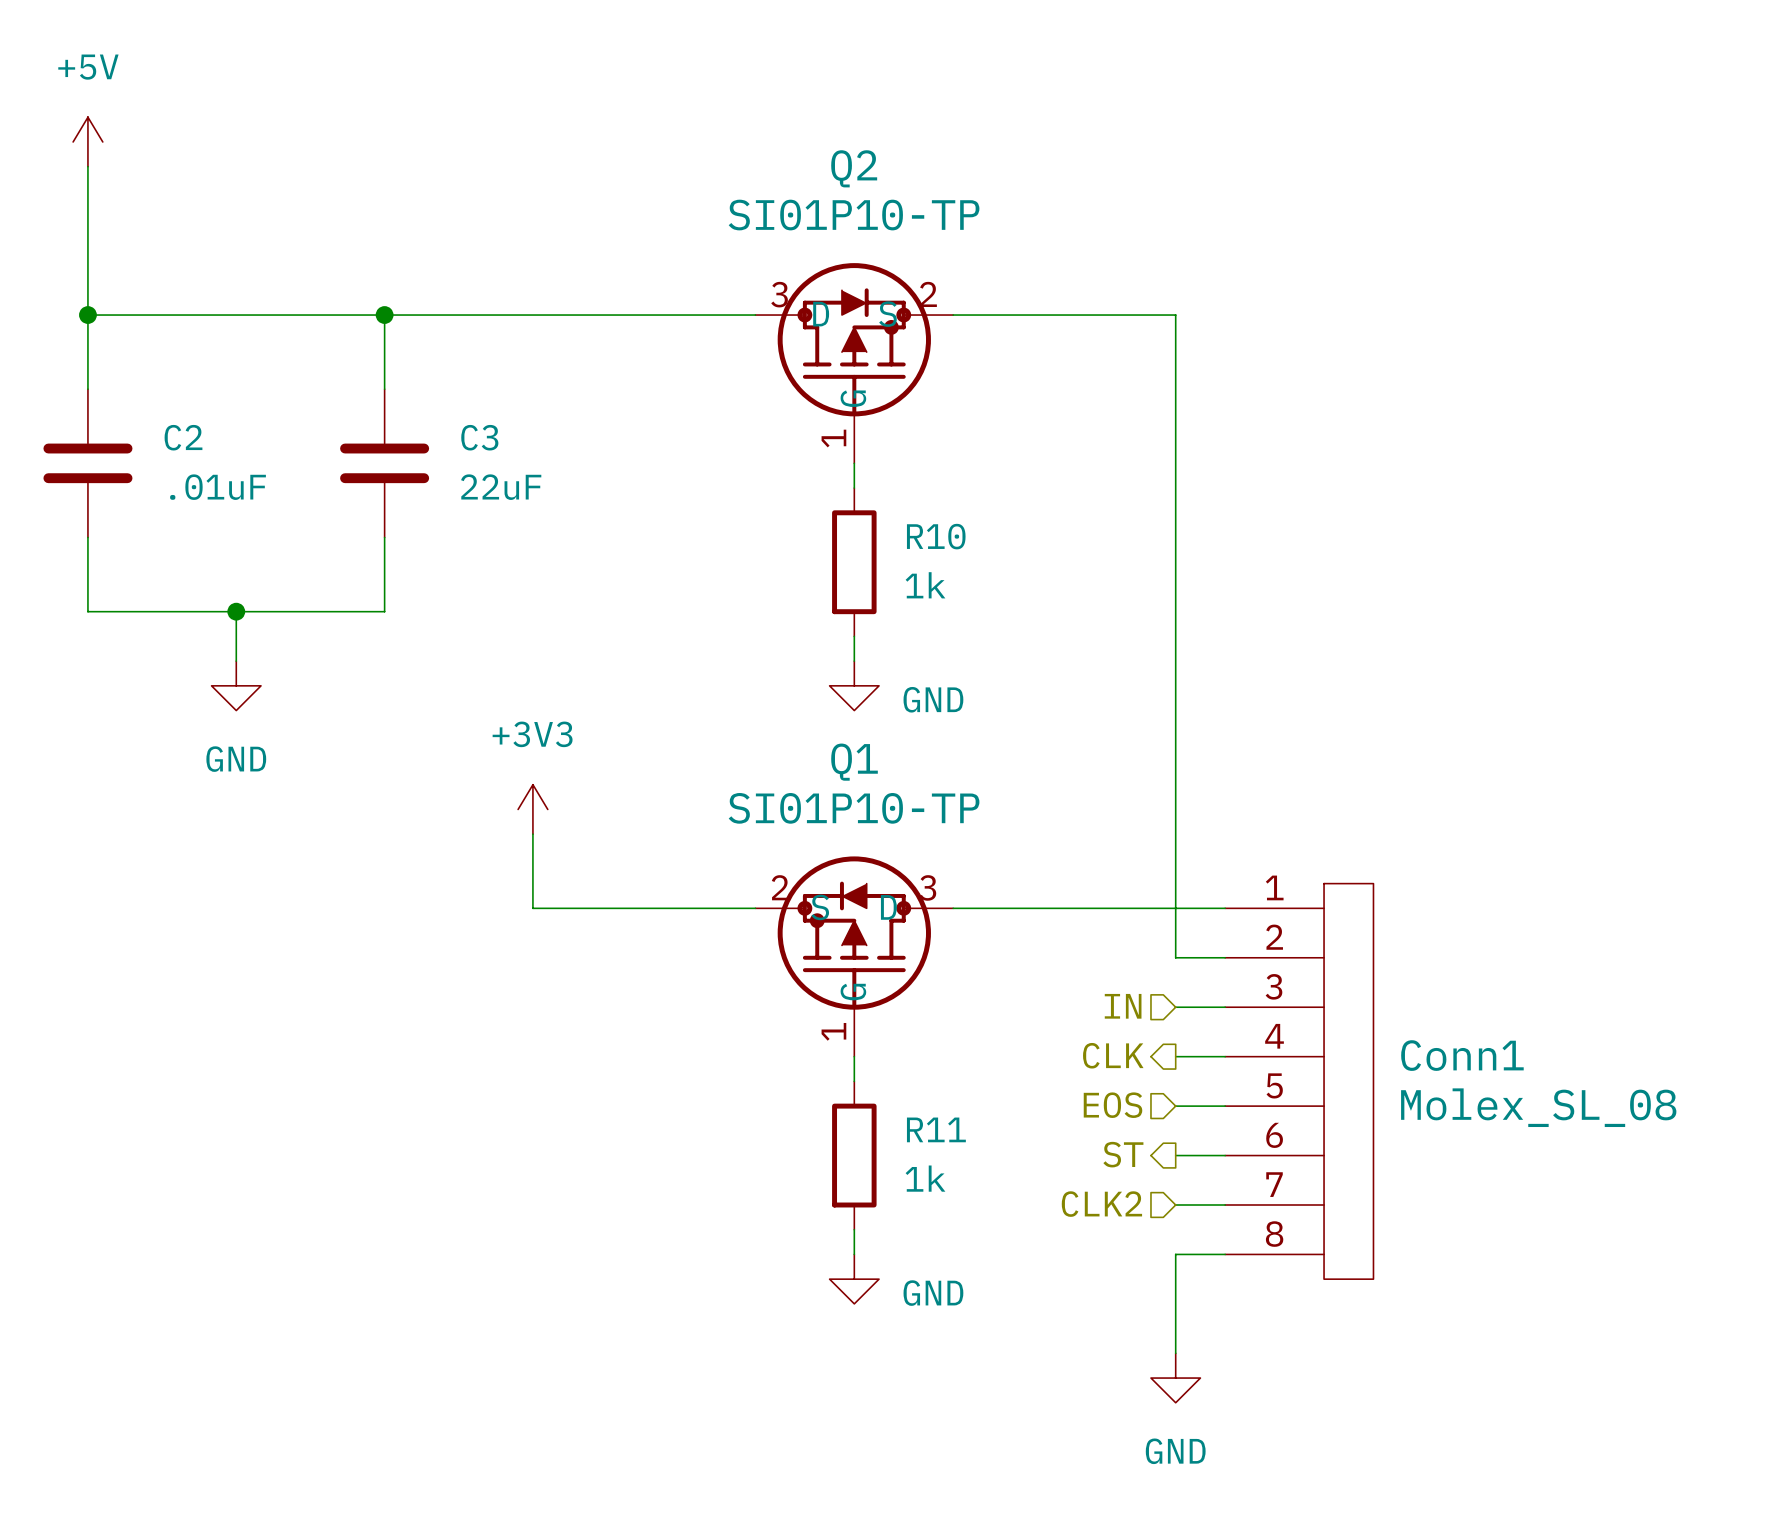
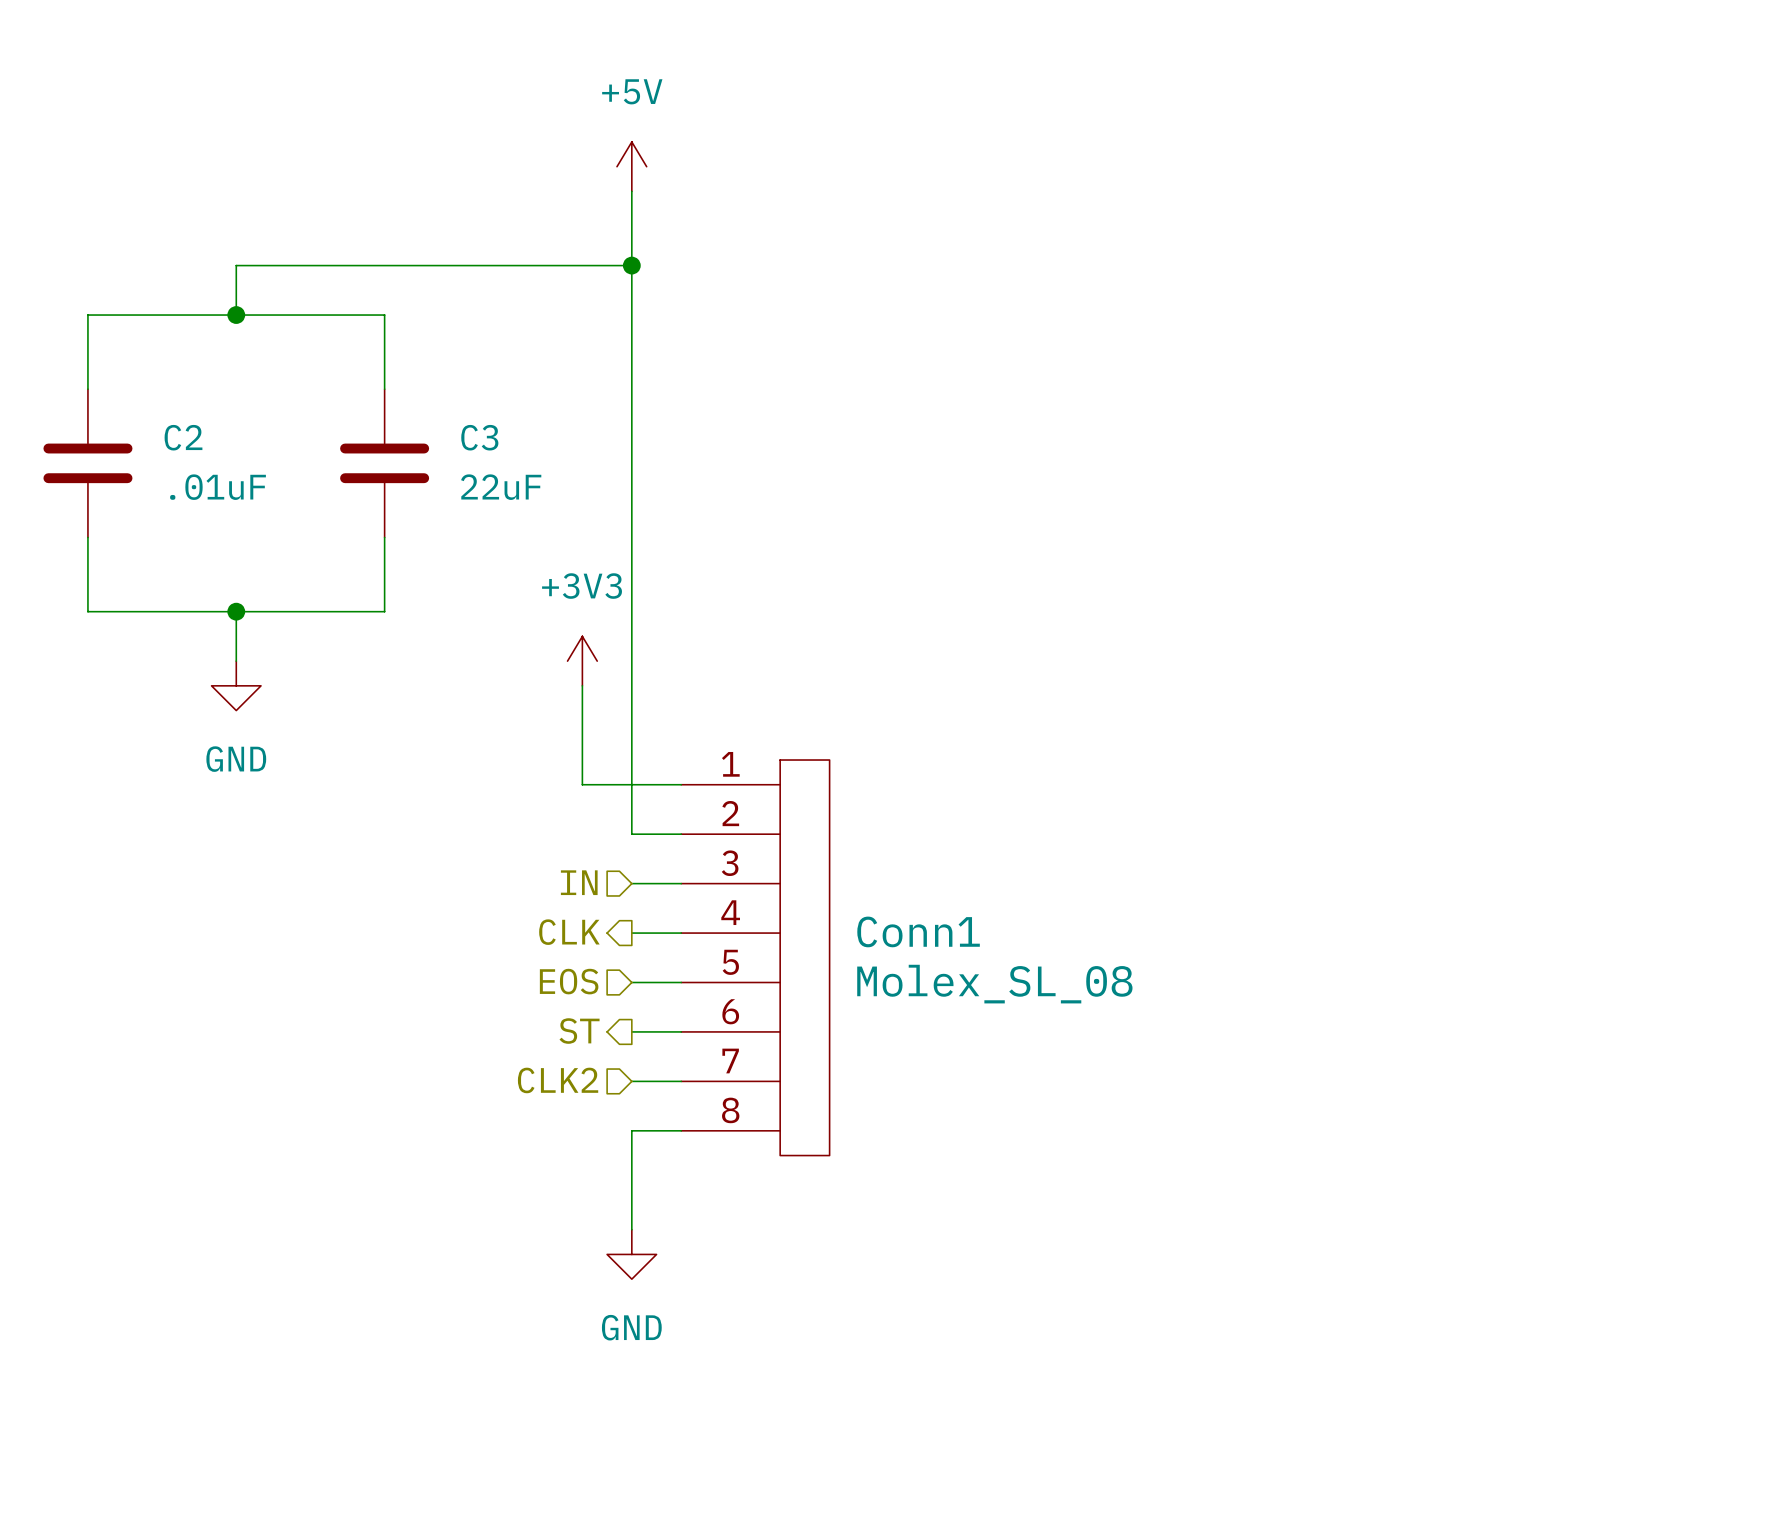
power symbol: +5V (87, 141) -> none
wire: (87, 166) (87, 315) -> none
power symbol: none -> +5V (631, 166)
wire: none -> (631, 191) (631, 834) (681, 834)
wire: none -> (631, 265) (236, 265) (236, 315)
junction: none -> (631, 265)
junction: (87, 315) -> none
junction: none -> (236, 315)
wire: (384, 315) (755, 315) -> none
junction: (384, 315) -> none
wire: (953, 315) (1175, 315) (1175, 957) (1225, 957) -> none
Q2: SI01P10-TP (854, 363) -> none
wire: (854, 463) (854, 488) -> none
R10: 1k (854, 562) -> none
wire: (854, 636) (854, 661) -> none
wire: none -> (582, 685) (582, 784) (681, 784)
power symbol: GND (854, 685) -> none
power symbol position: +3V3 (532, 809) -> +3V3 (582, 661)
wire: (532, 834) (532, 908) (755, 908) -> none
hierarchical label: none -> IN (579, 882)
wire: none -> (631, 883) (681, 883)
wire: (953, 908) (1225, 908) -> none
hierarchical label: none -> CLK (569, 932)
wire: none -> (631, 933) (681, 933)
Q1: SI01P10-TP (854, 956) -> none
hierarchical label: none -> EOS (569, 981)
wire: none -> (631, 982) (681, 982)
hierarchical label: IN (1123, 1006) -> none
wire: (1175, 1007) (1225, 1007) -> none
hierarchical label: none -> ST (579, 1031)
wire: none -> (631, 1031) (681, 1031)
hierarchical label: CLK (1113, 1055) -> none
wire: (854, 1056) (854, 1081) -> none
wire: (1175, 1056) (1225, 1056) -> none
hierarchical label: none -> CLK2 (558, 1080)
wire: none -> (631, 1081) (681, 1081)
Conn1 position: (1299, 1081) -> (755, 957)
hierarchical label: EOS (1112, 1105) -> none
wire: (1175, 1106) (1225, 1106) -> none
wire: none -> (681, 1130) (631, 1130) (631, 1229)
hierarchical label: ST (1123, 1154) -> none
R11: 1k (854, 1155) -> none
wire: (1175, 1155) (1225, 1155) -> none
hierarchical label: CLK2 (1101, 1204) -> none
wire: (1175, 1204) (1225, 1204) -> none
wire: (854, 1229) (854, 1254) -> none
wire: (1225, 1254) (1175, 1254) (1175, 1353) -> none
power symbol position: GND (854, 1279) -> GND (631, 1254)
power symbol text position: GND (933, 1293) -> GND (631, 1327)
power symbol: GND (1175, 1378) -> none

